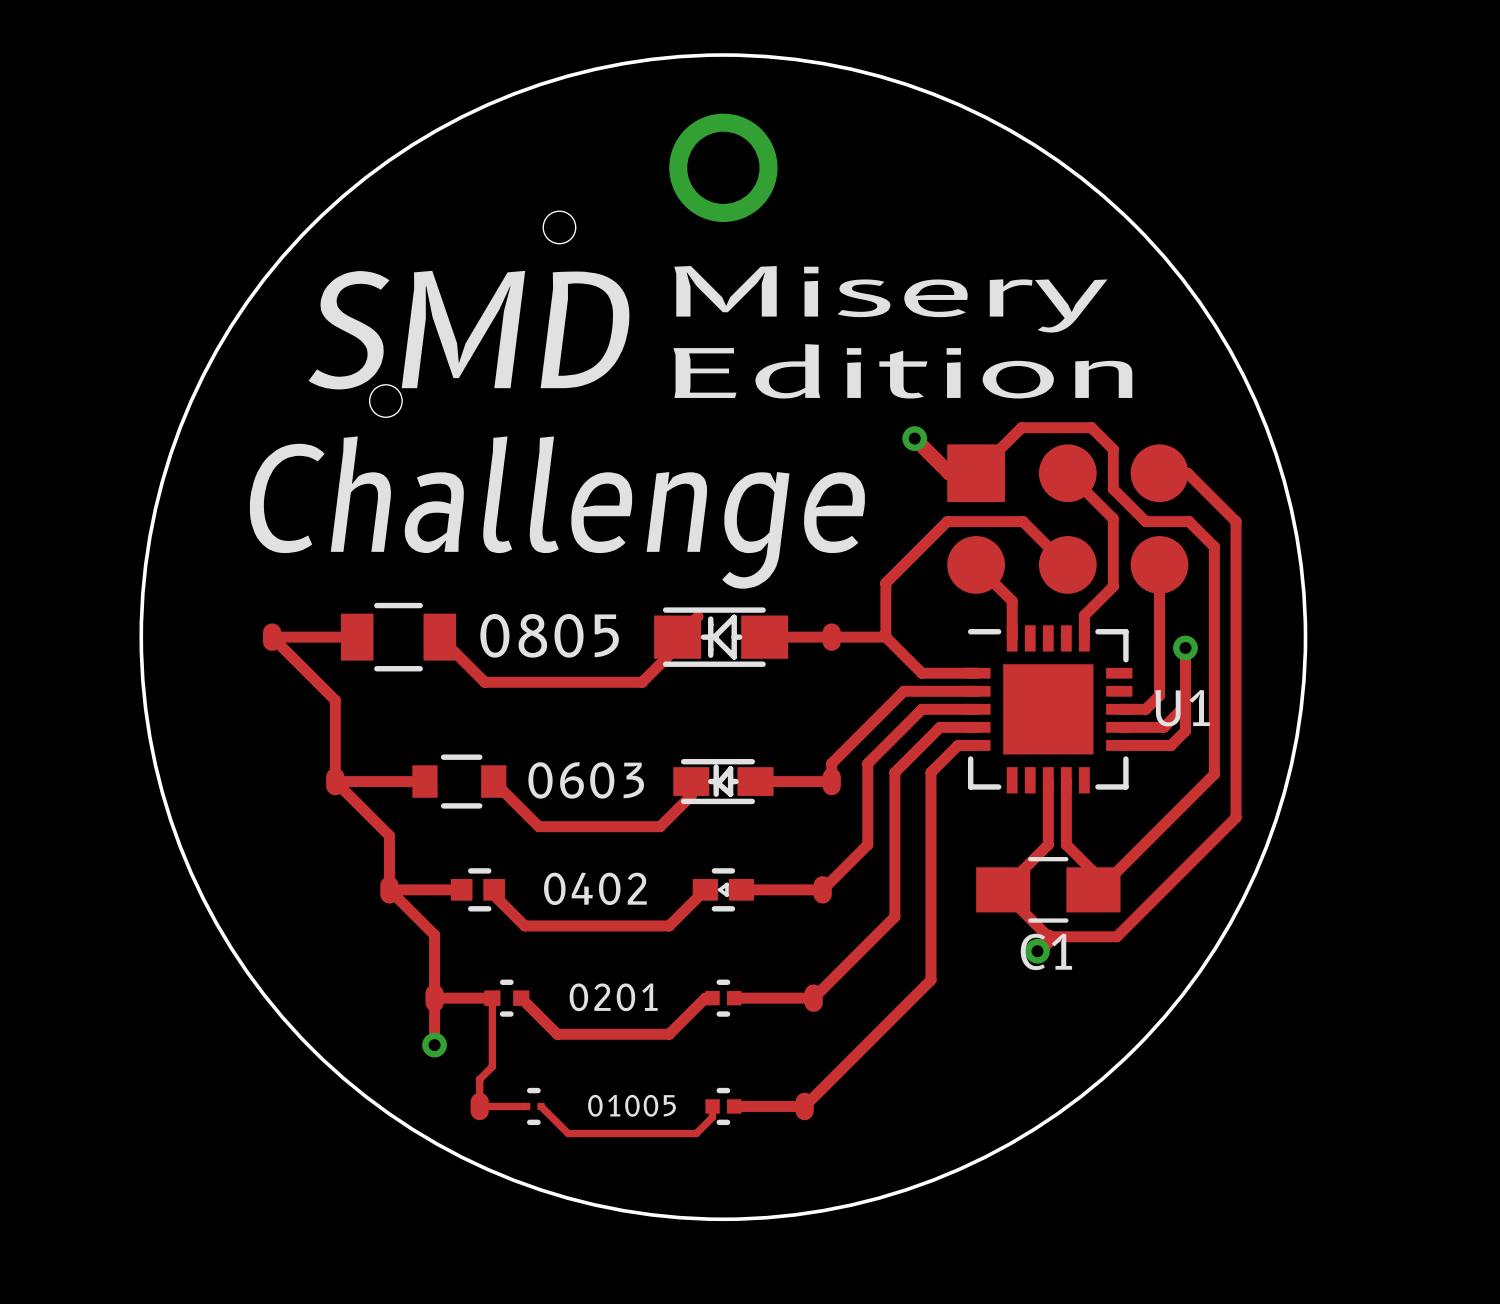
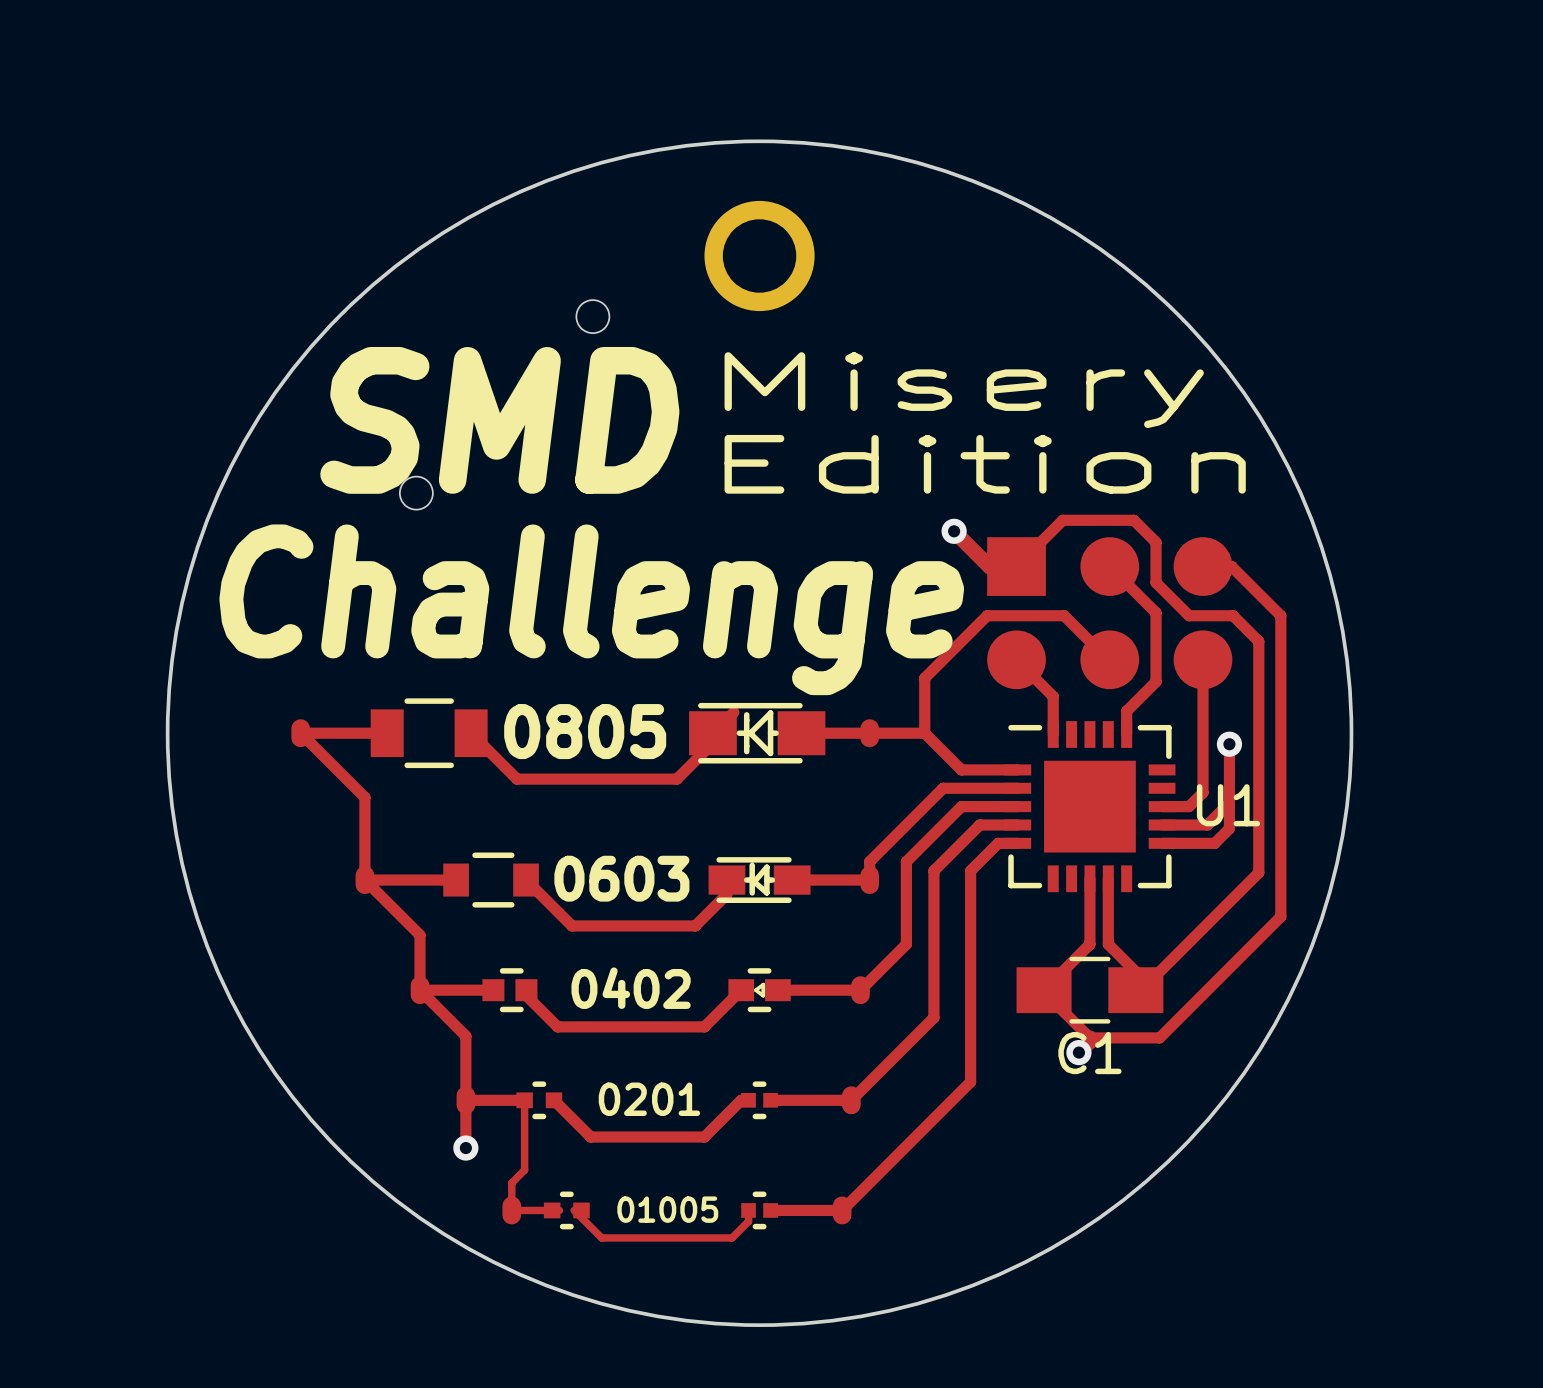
part footprint: [523, 1087, 545, 1126] -> [543, 1191, 590, 1230]

